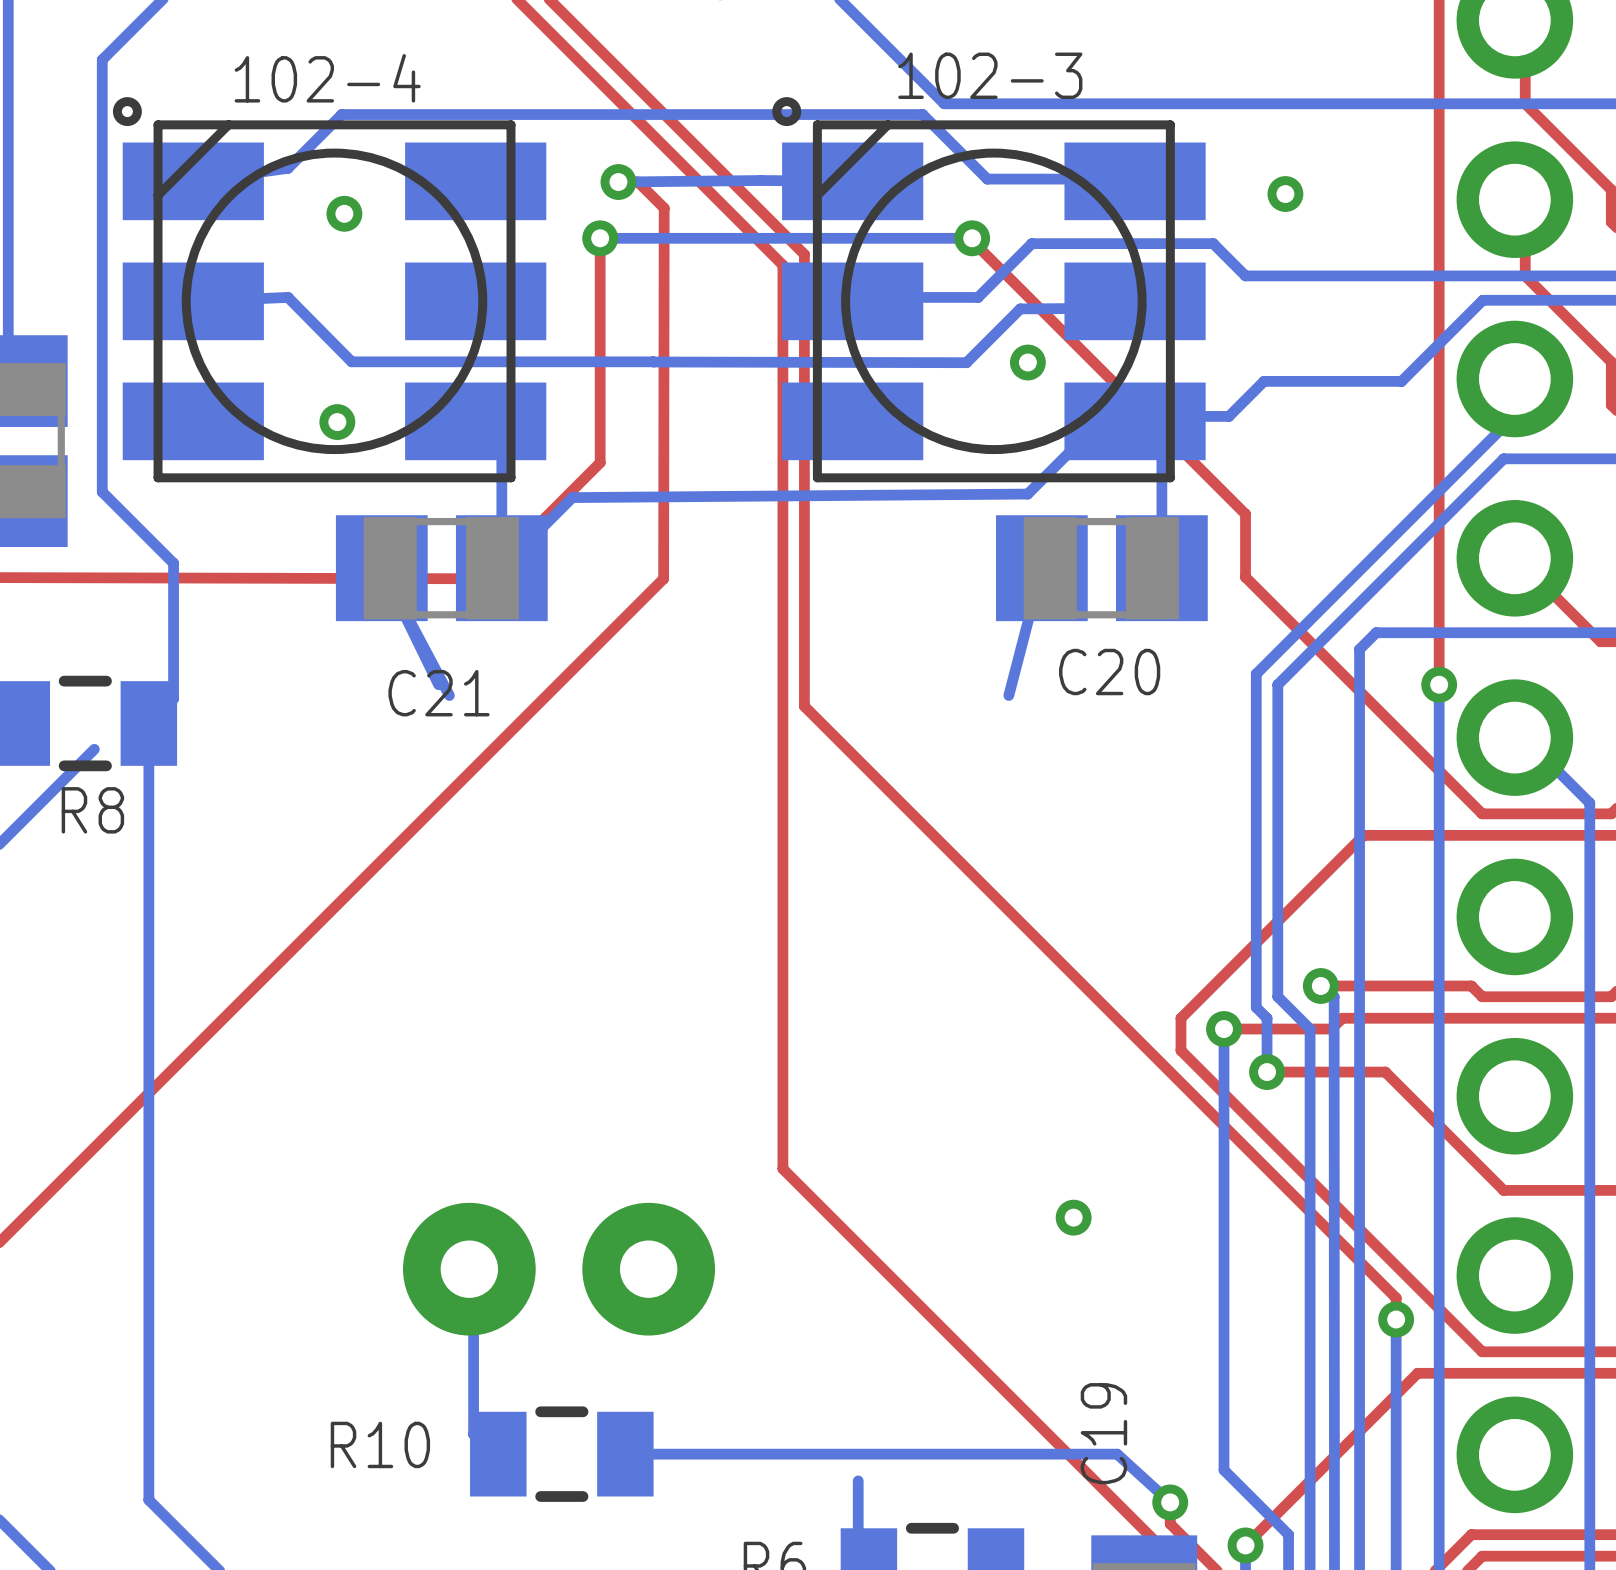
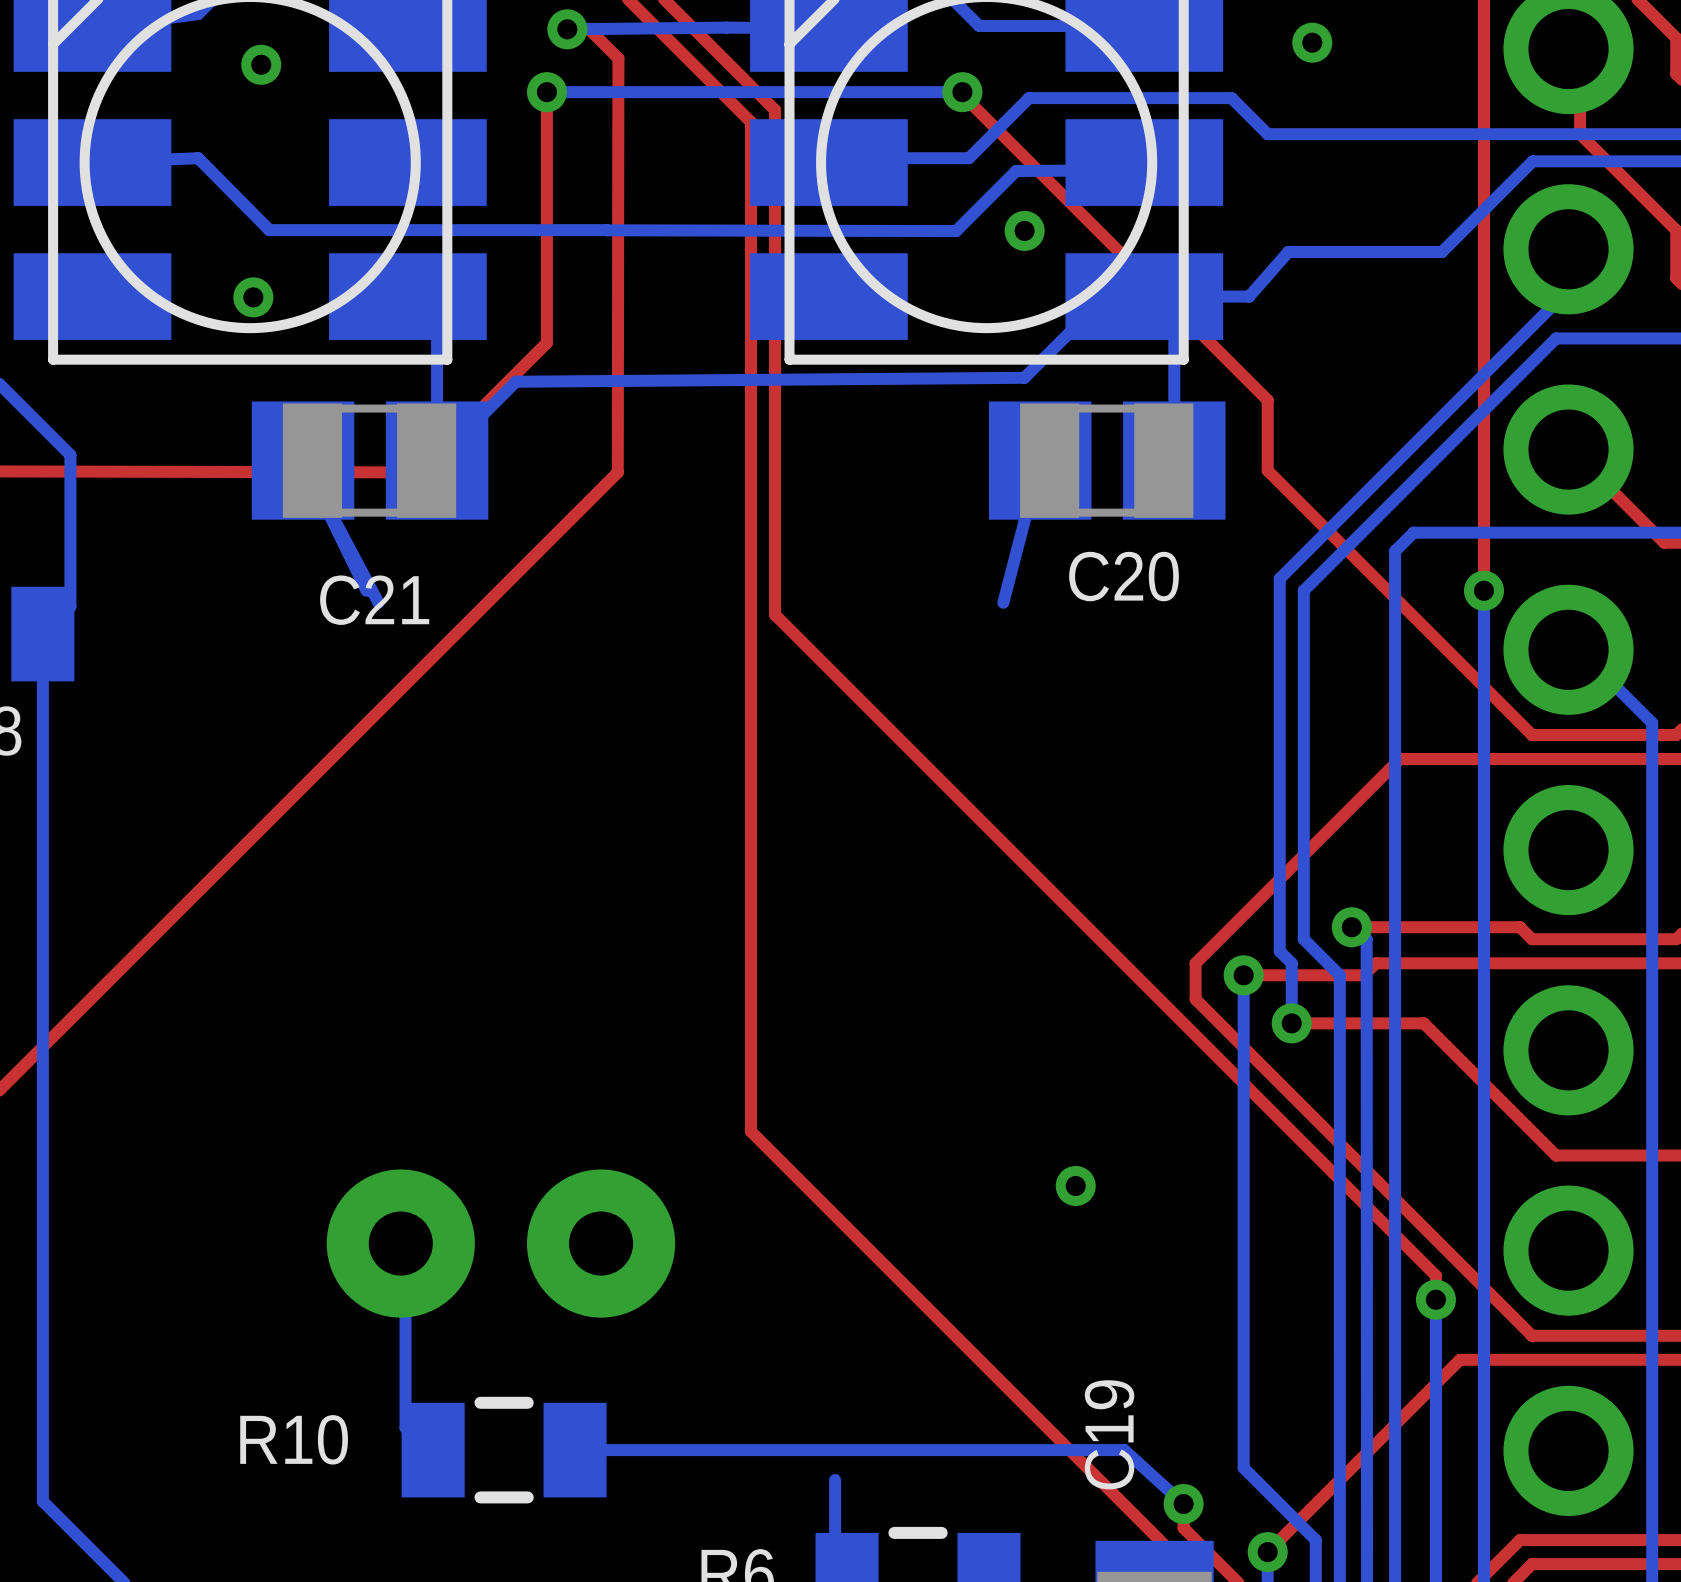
bottom track: (1263, 381) (1228, 416) (1176, 416) -> (1288, 251) (1249, 296) (1144, 296)

